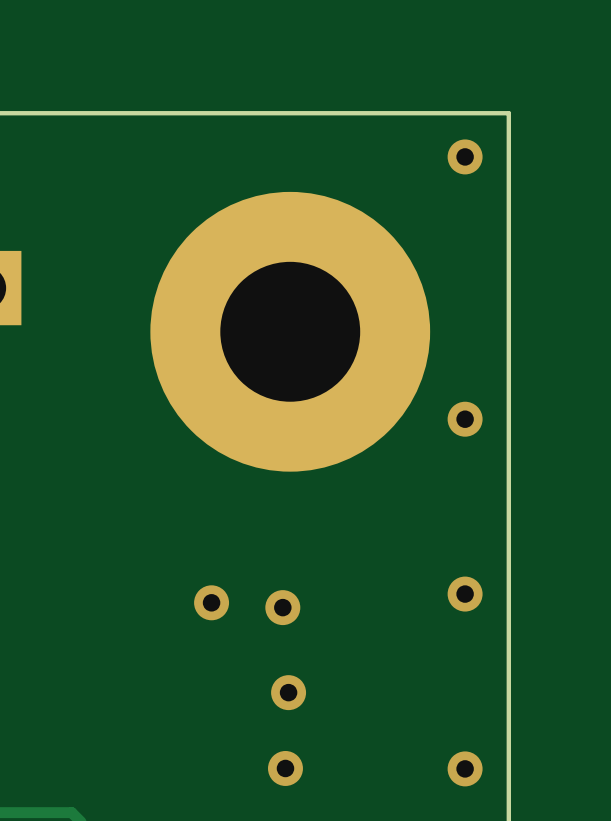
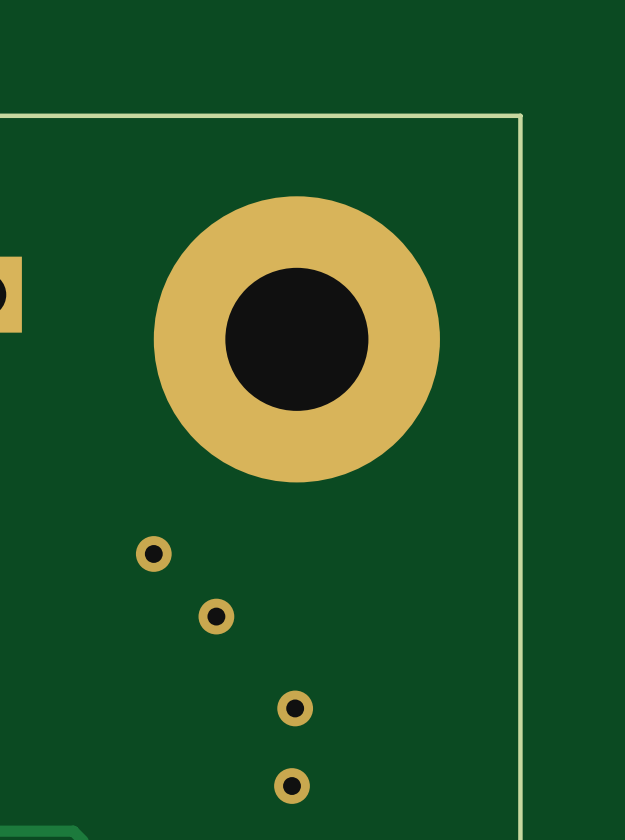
via: (465, 156) -> none
via: (465, 419) -> none
via: (465, 594) -> none
via position: (282, 607) -> (153, 553)
via: (465, 768) -> none

